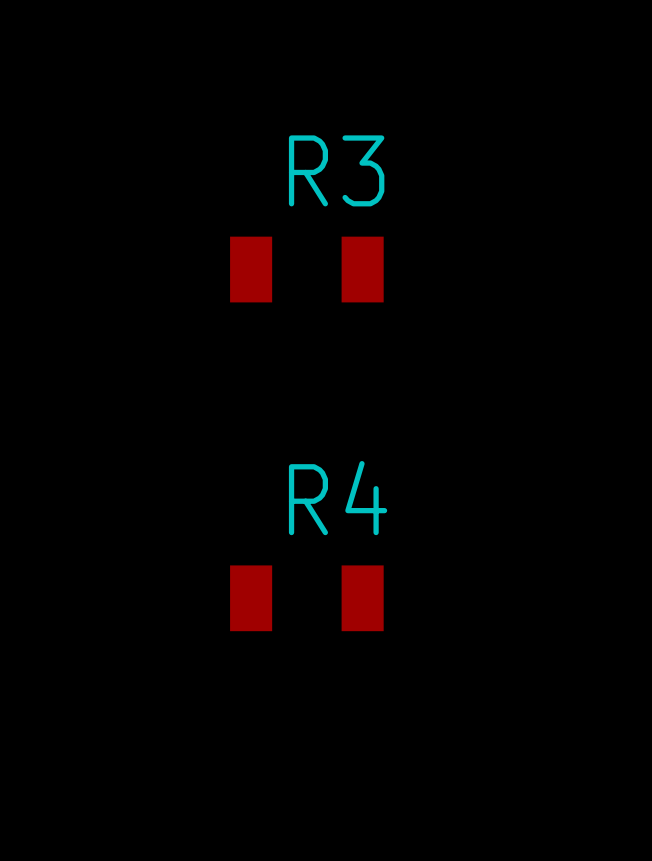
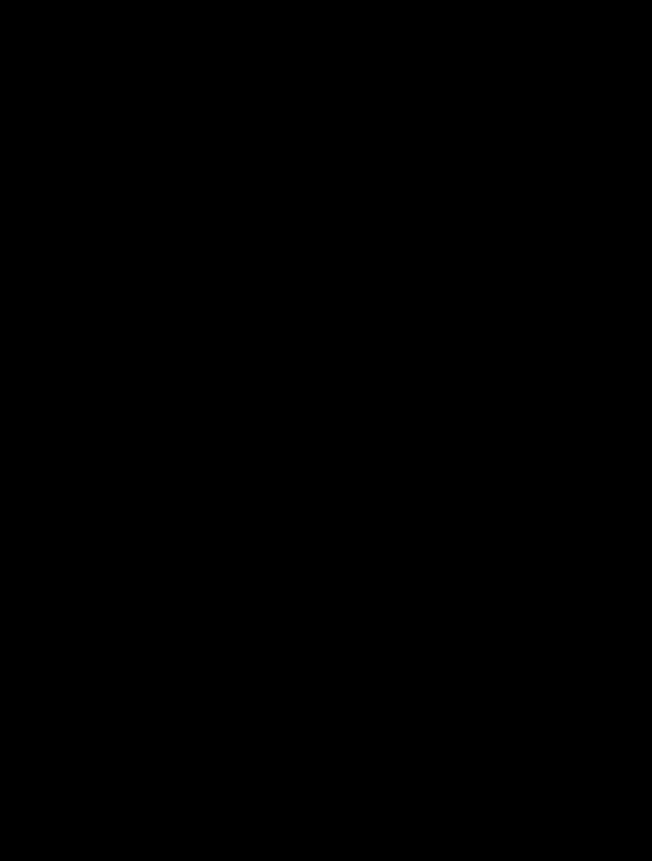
R3: (306, 269) -> none
R4: (306, 598) -> none

